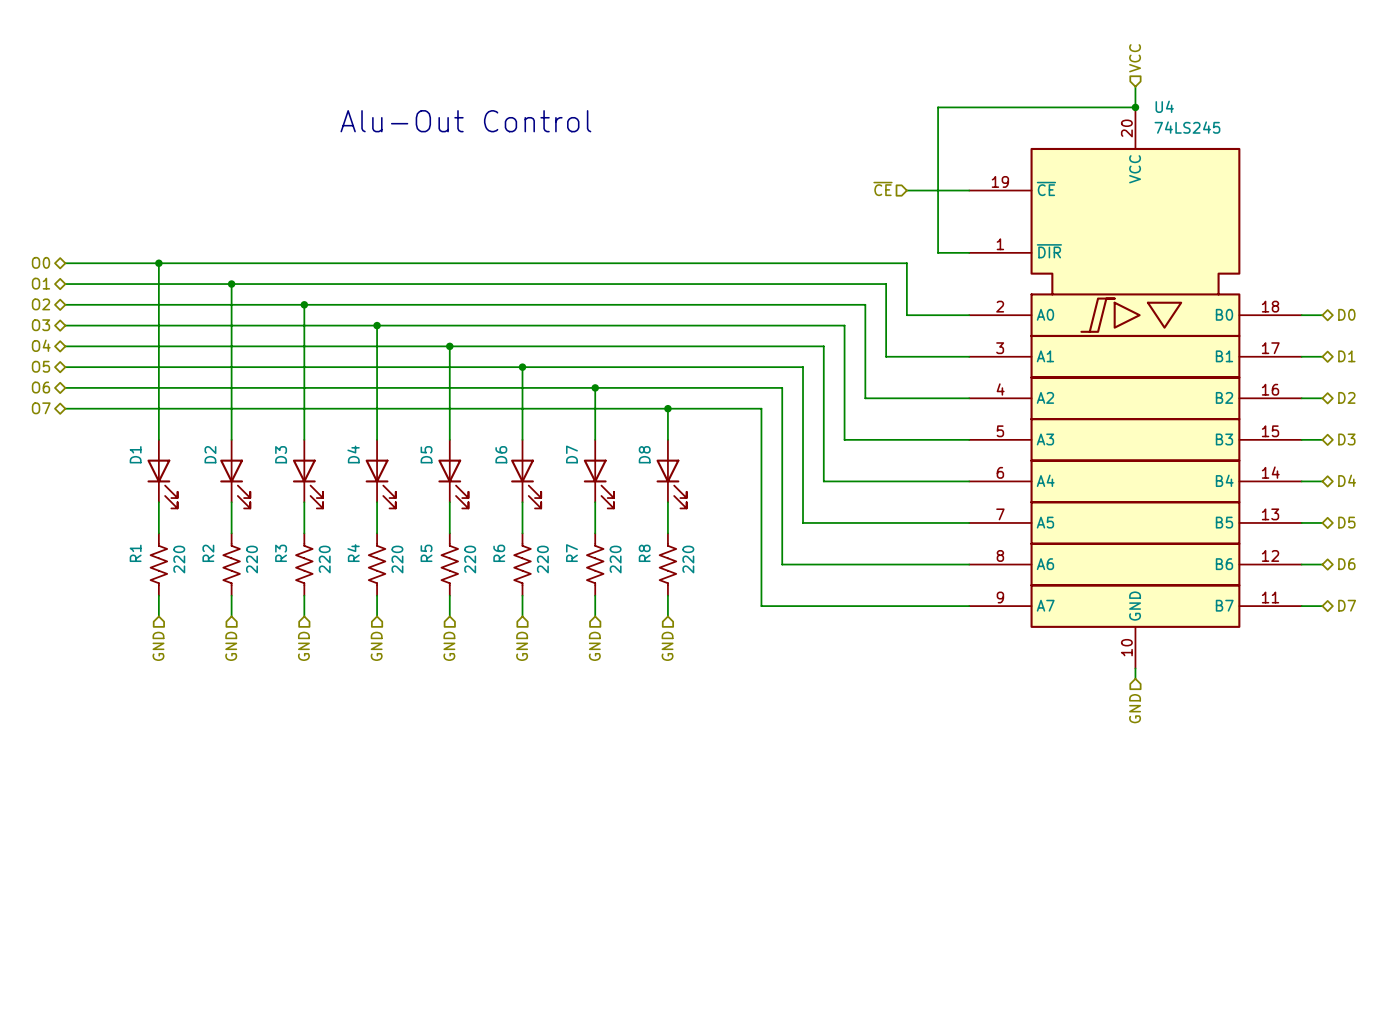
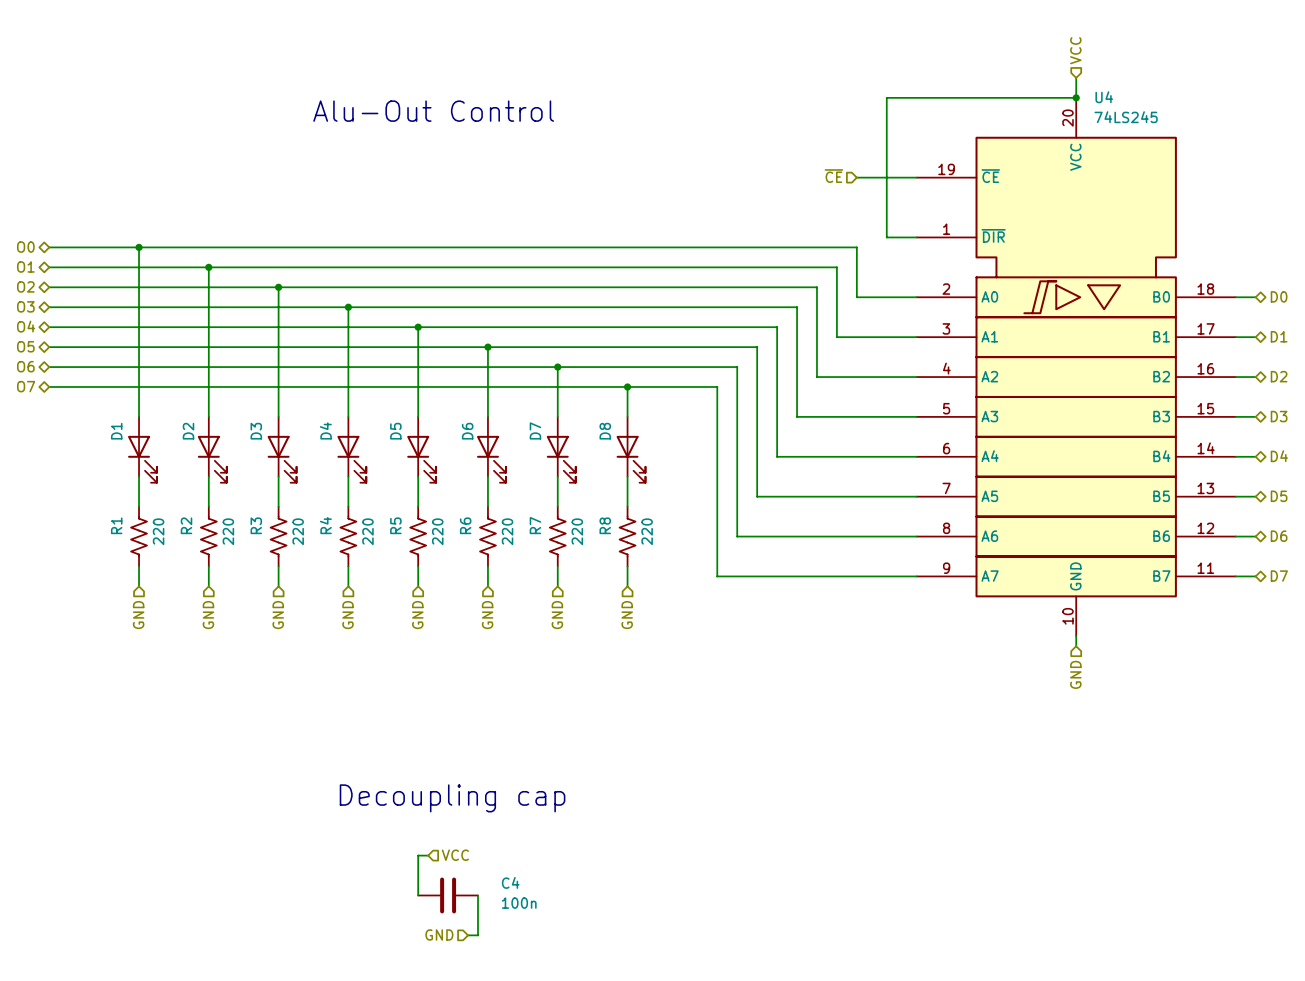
text: none -> Decoupling cap (452, 798)
wire: none -> (428, 855) (418, 855) (418, 895)
hierarchical label: none -> VCC (455, 855)
C4: none -> 100n (448, 895)
wire: none -> (478, 895) (478, 935) (468, 935)
hierarchical label: none -> GND (439, 934)

